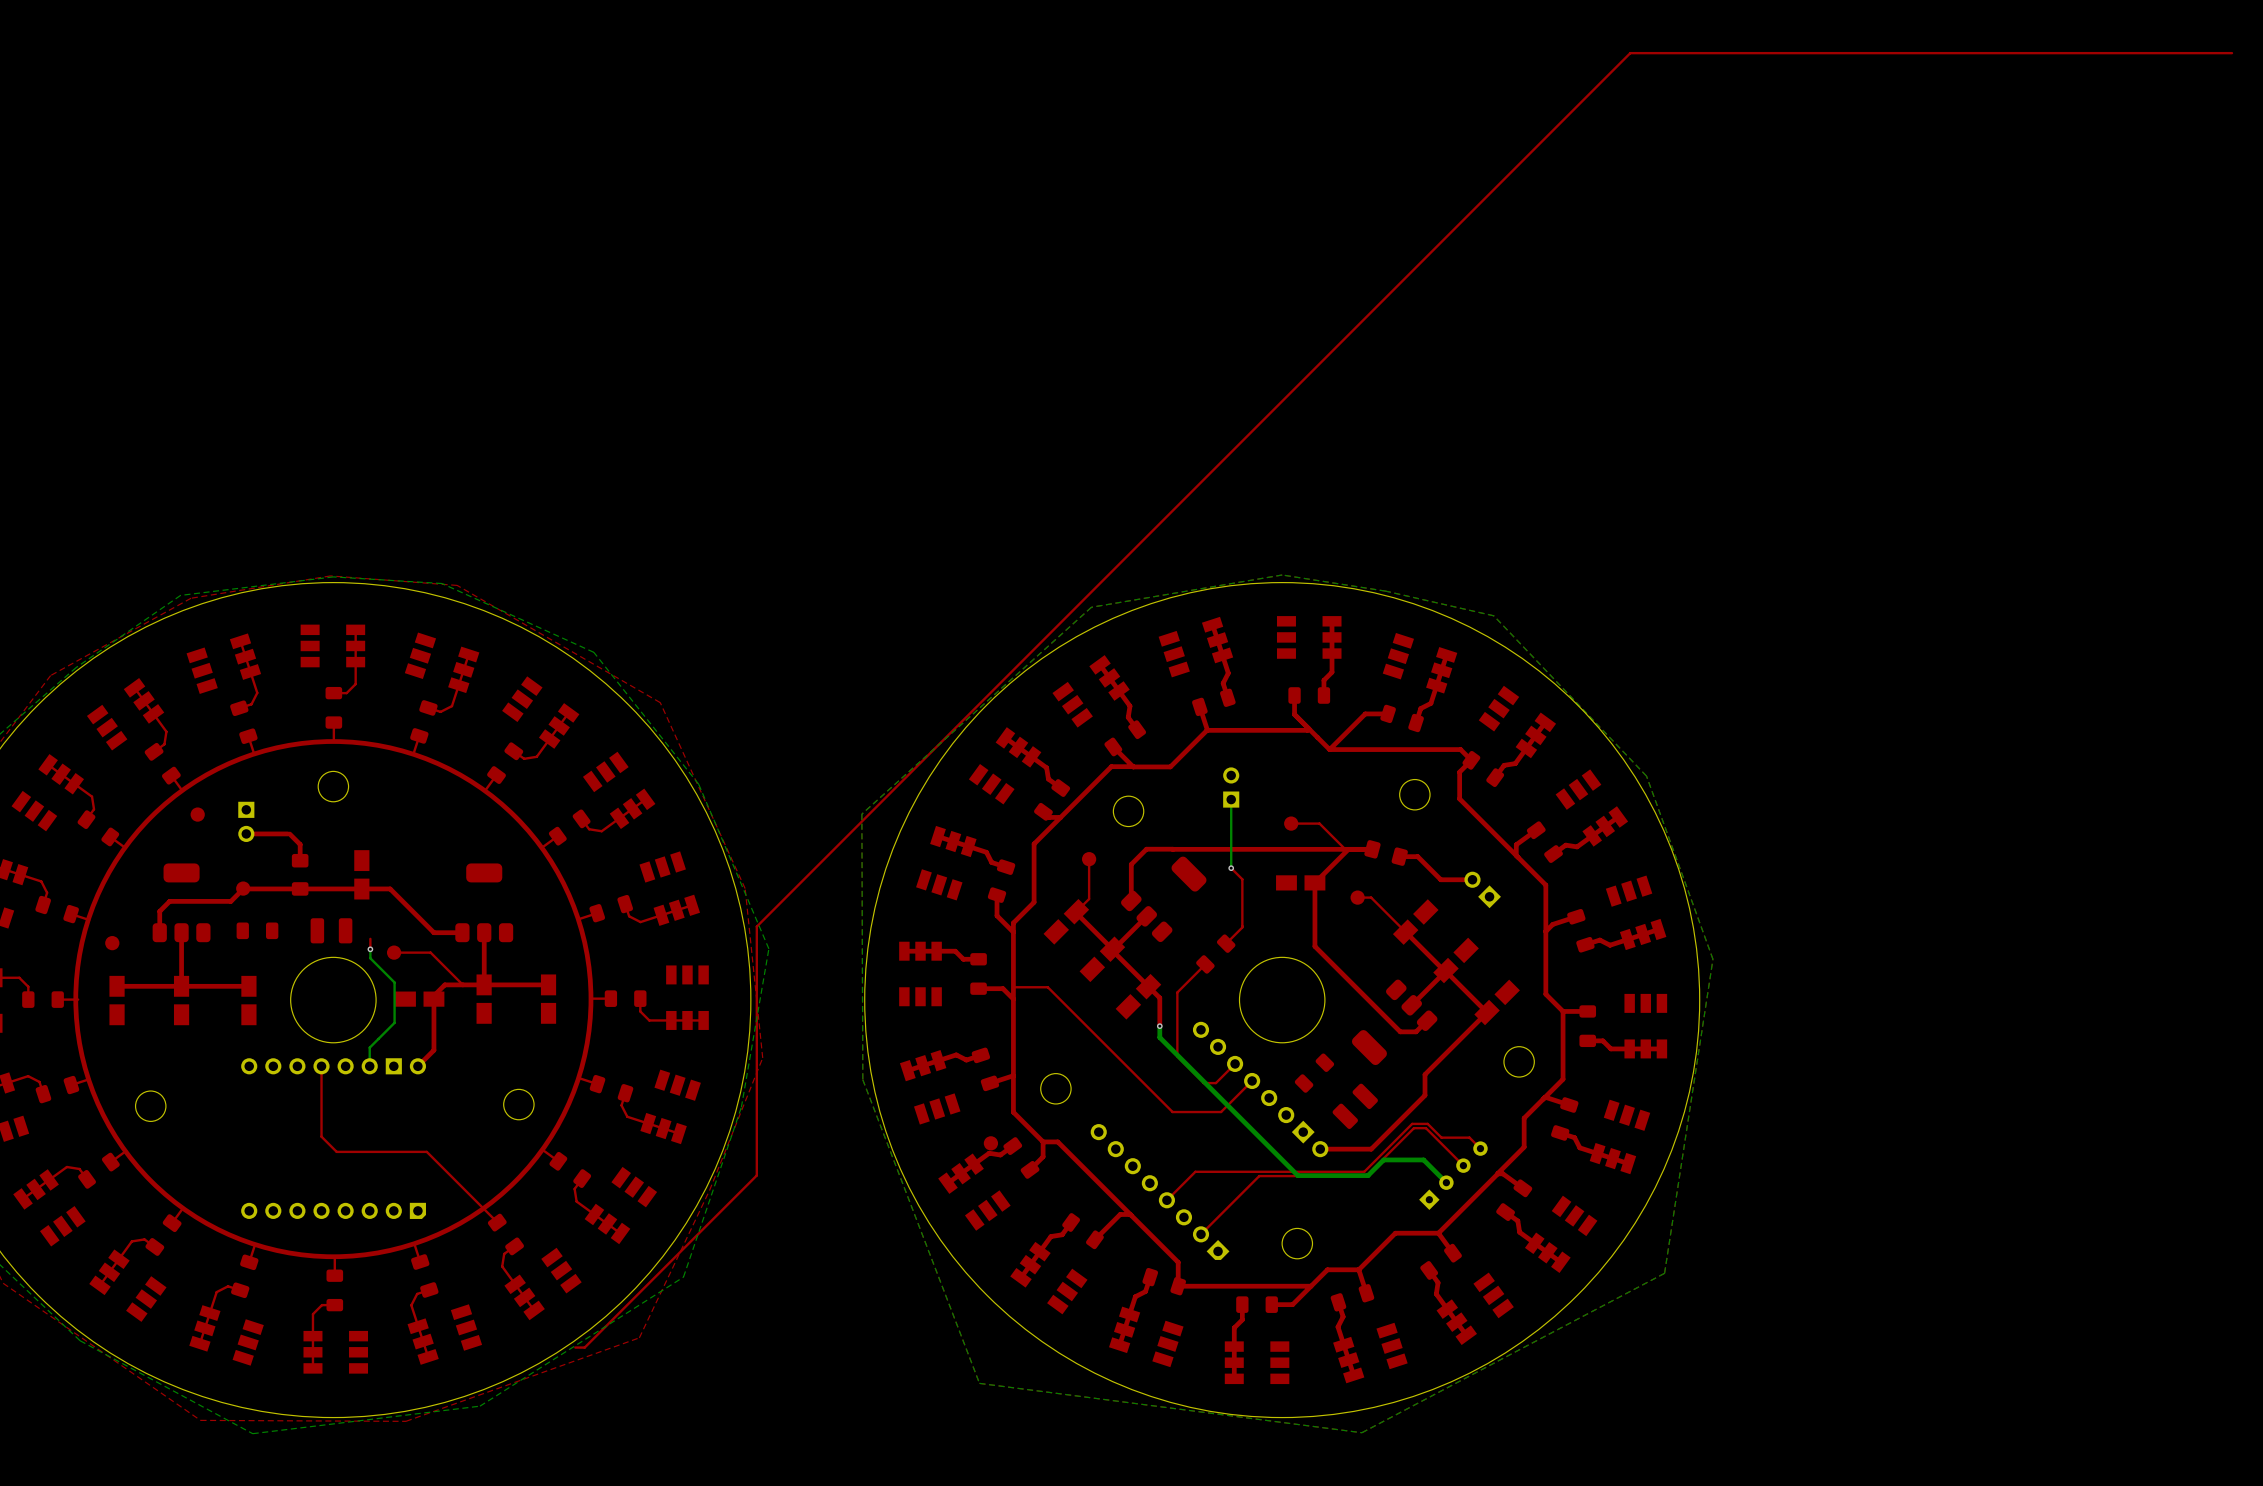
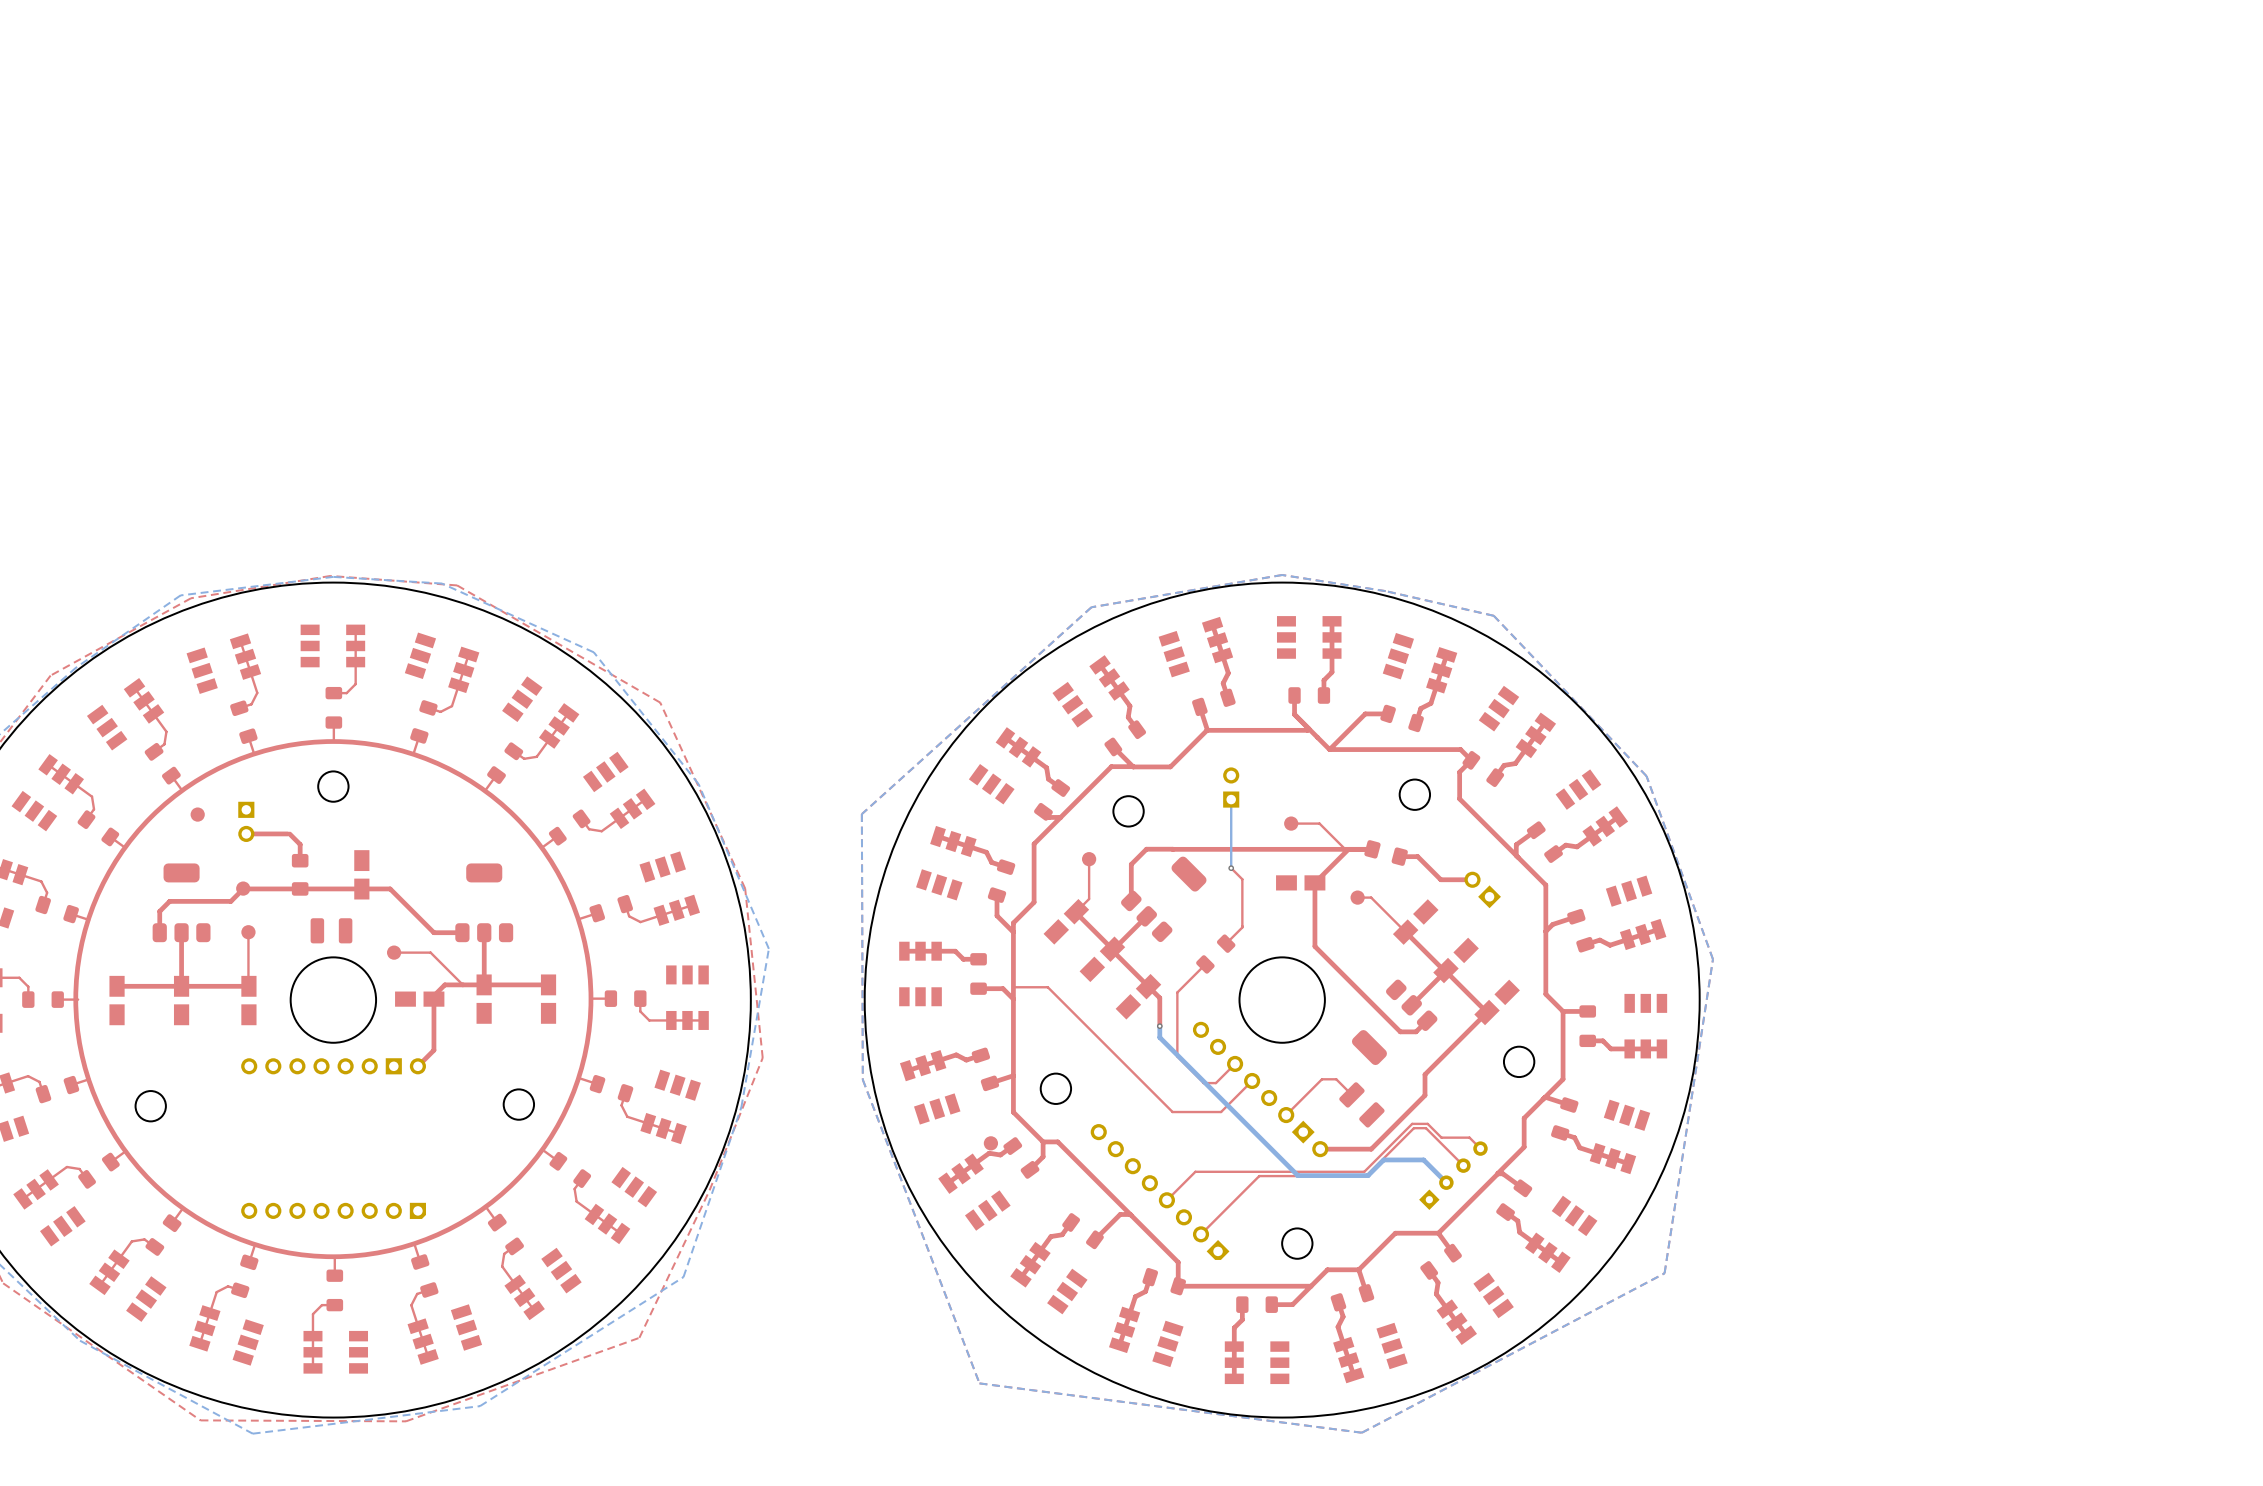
top track: (2231, 53) (1630, 53) (756, 926) (756, 1175) (584, 1347) (575, 1347) -> none
part footprint: [236, 922, 279, 940] -> [241, 925, 256, 940]
top track: none -> (248, 932) (248, 985)
top track: (370, 938) (370, 949) -> none
part: (112, 943) -> none
bottom track: (370, 949) (370, 958) (394, 982) (394, 1022) (369, 1047) (369, 1066) -> none
via: (370, 949) -> none
top track: (321, 1066) (321, 1136) (336, 1151) (426, 1151) (497, 1222) -> (486, 1207) (497, 1222)
part: (1314, 1073) -> none
top track: none -> (1351, 1094) (1336, 1079) (1321, 1079) (1286, 1115)
part rotation: 0° (1355, 1106) -> 90° clockwise (1361, 1104)

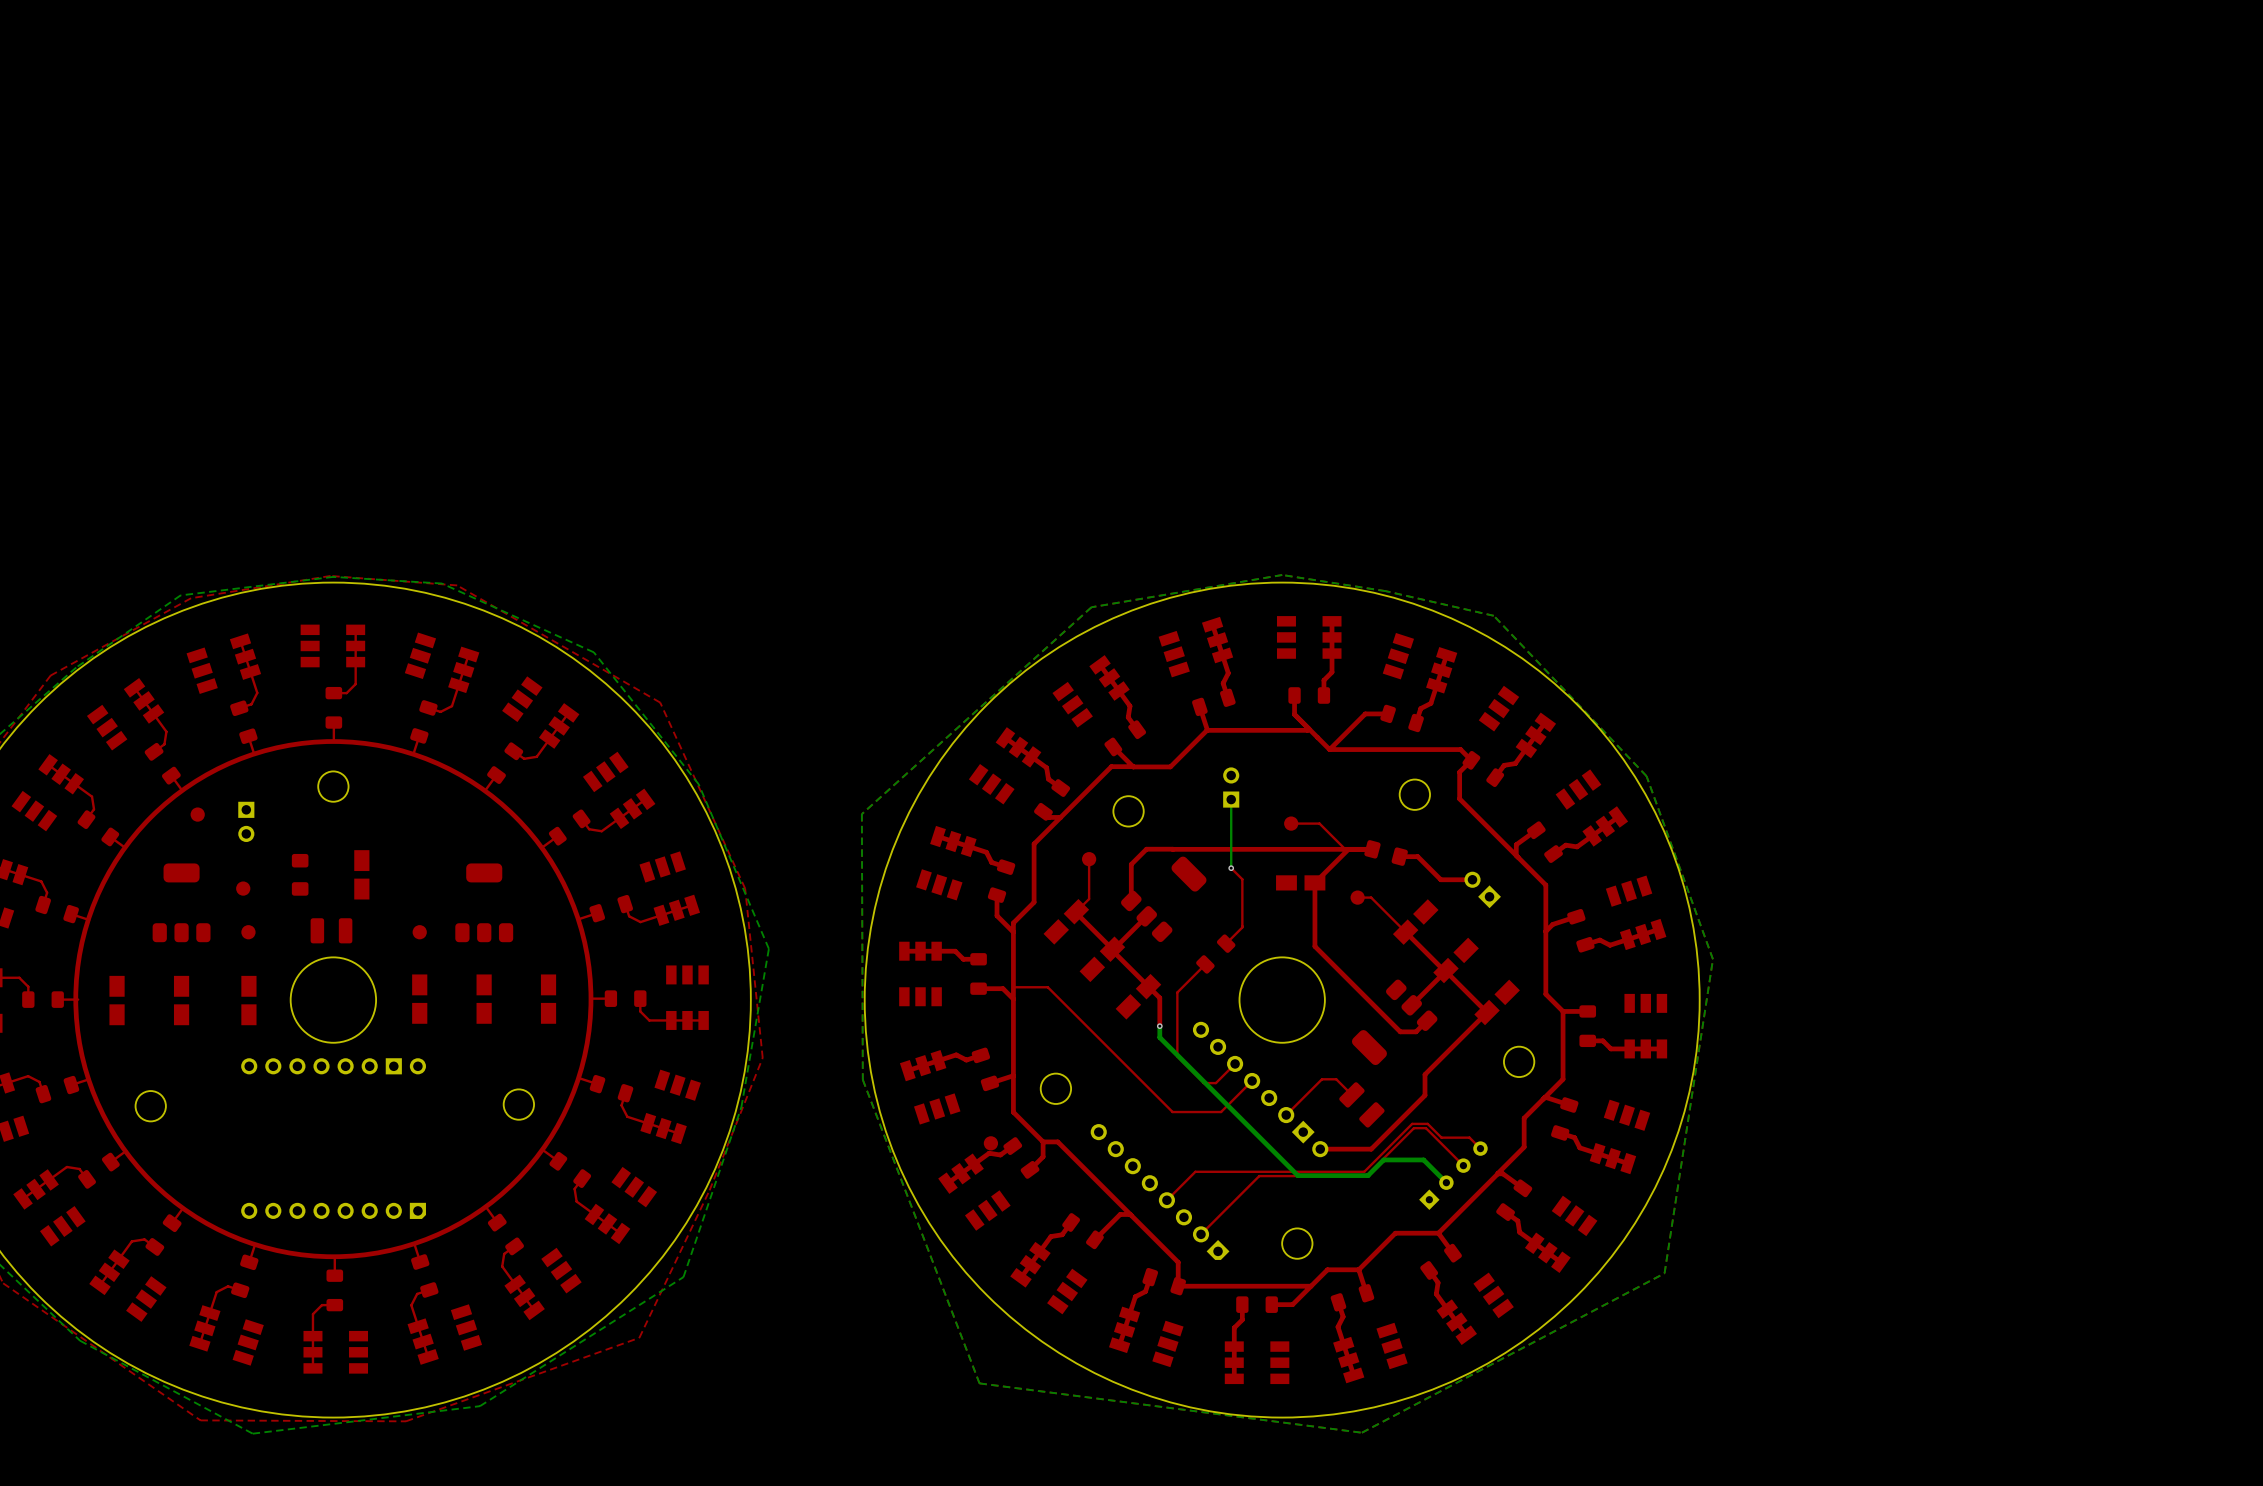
top track: (287, 833) (246, 833) -> none
top track: (287, 834) (300, 844) (300, 860) -> none
top track: (181, 932) (181, 986) -> none
top track: (248, 932) (248, 986) (117, 986) -> none
top track: (462, 932) (433, 932) (390, 888) (243, 888) (230, 901) (169, 901) (159, 911) (159, 932) -> none
top track: (484, 932) (484, 984) -> none
top track: (394, 952) (430, 952) (462, 984) -> none
part position: (394, 952) -> (419, 932)
top track: (548, 984) (444, 984) (433, 995) (433, 1050) (417, 1066) -> none
part rotation: 0° (419, 999) -> 90° clockwise (419, 999)

